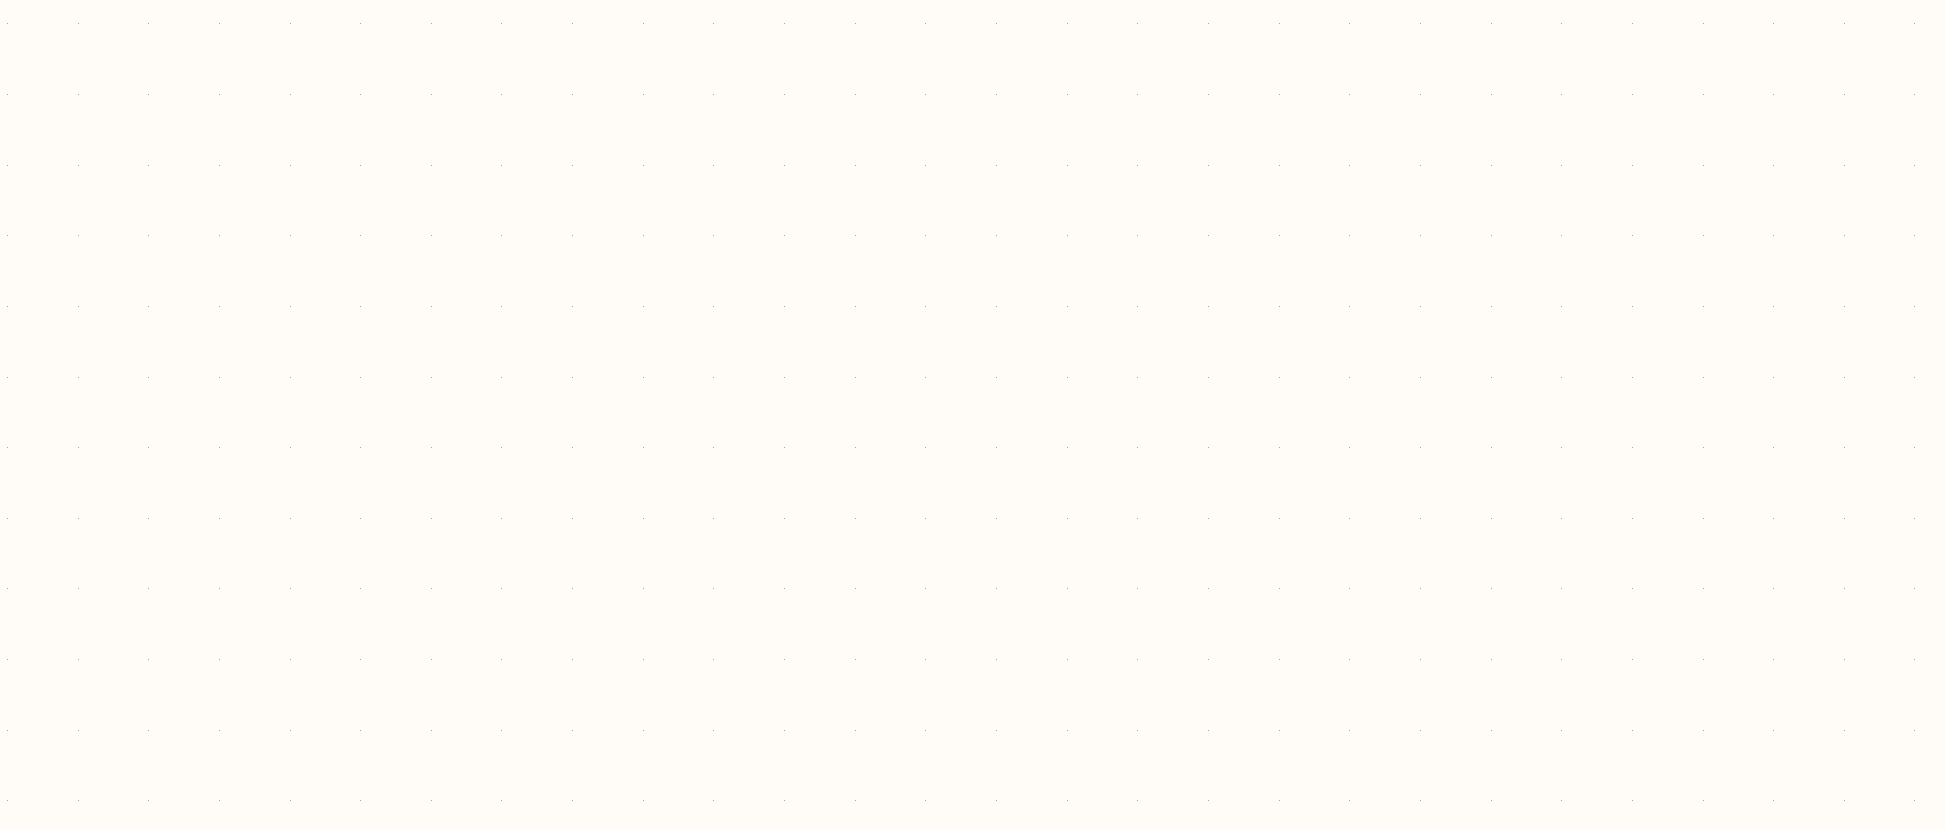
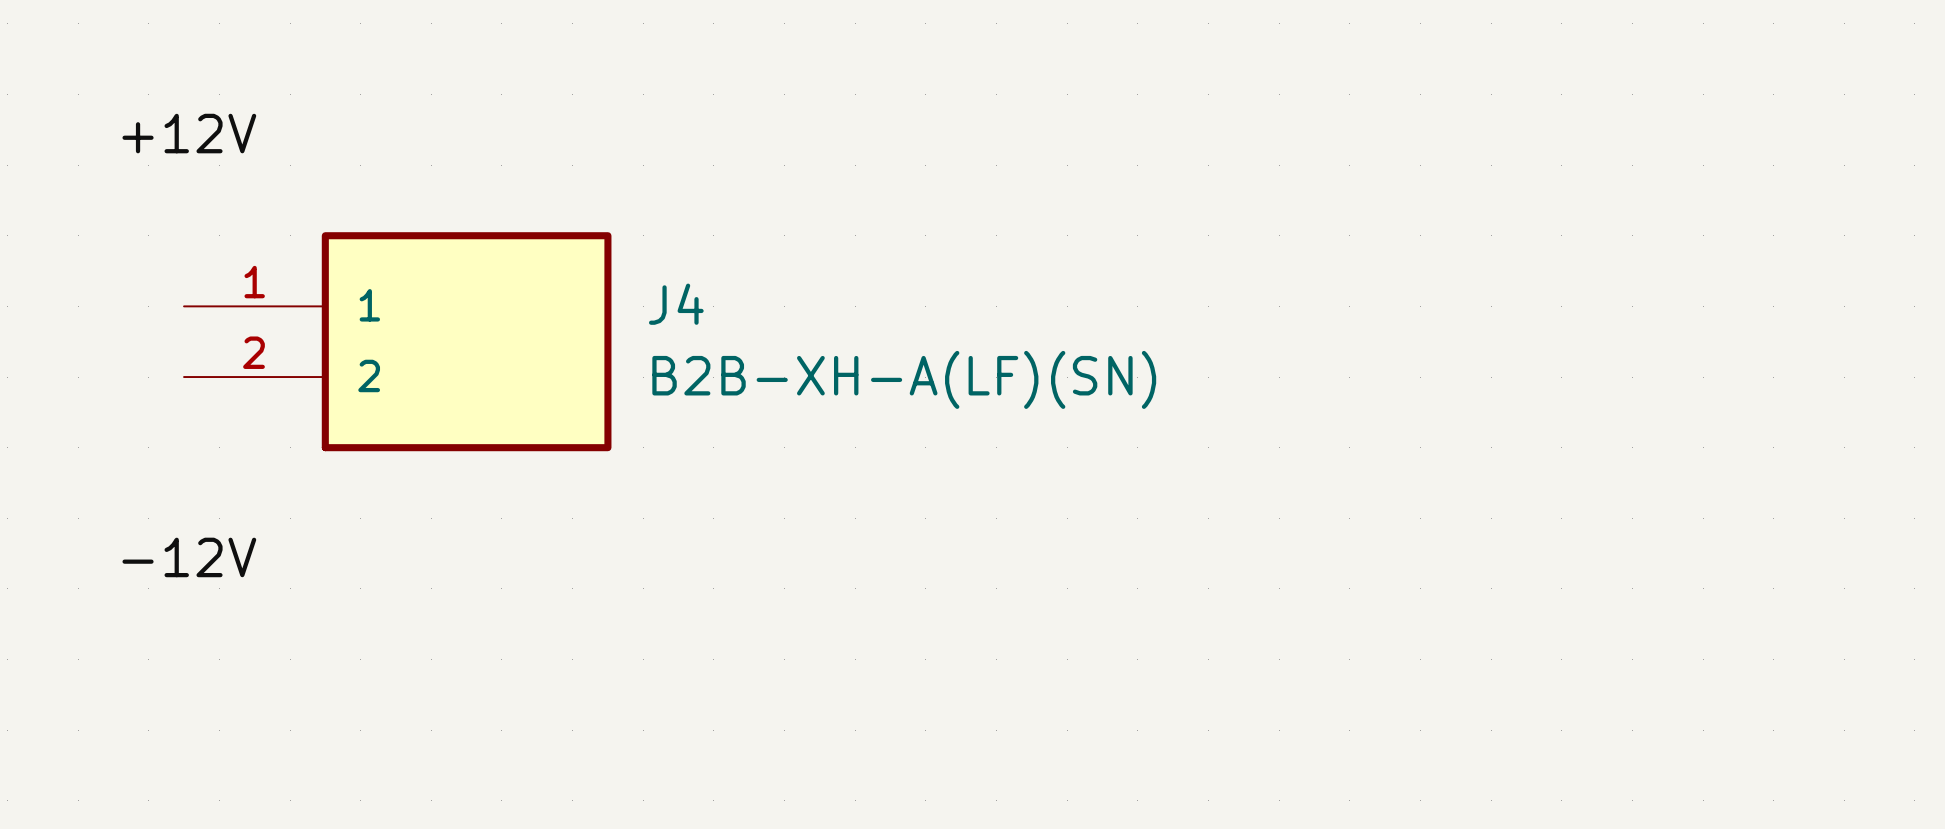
label: none -> +12V (189, 133)
J4: none -> B2B-XH-A(LF)(SN) (397, 341)
label: none -> -12V (189, 557)

